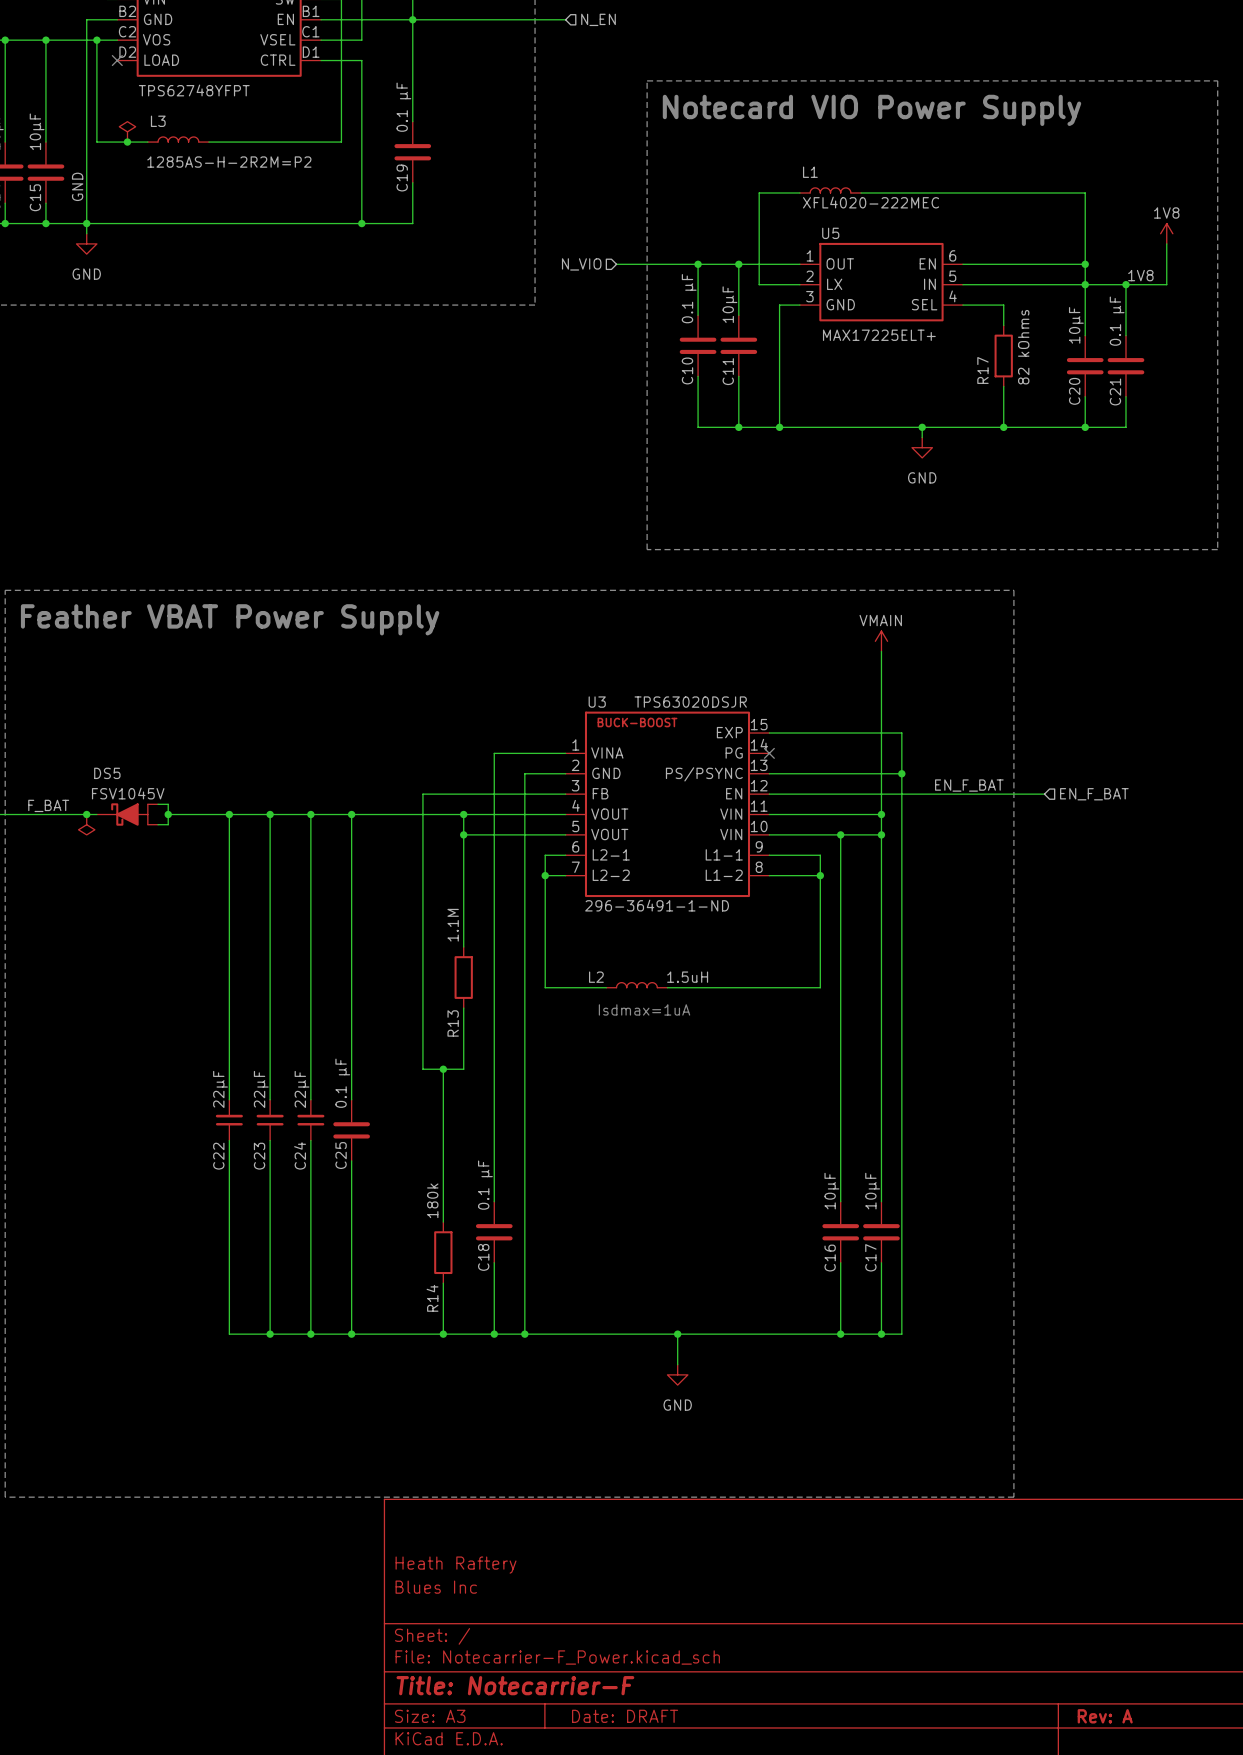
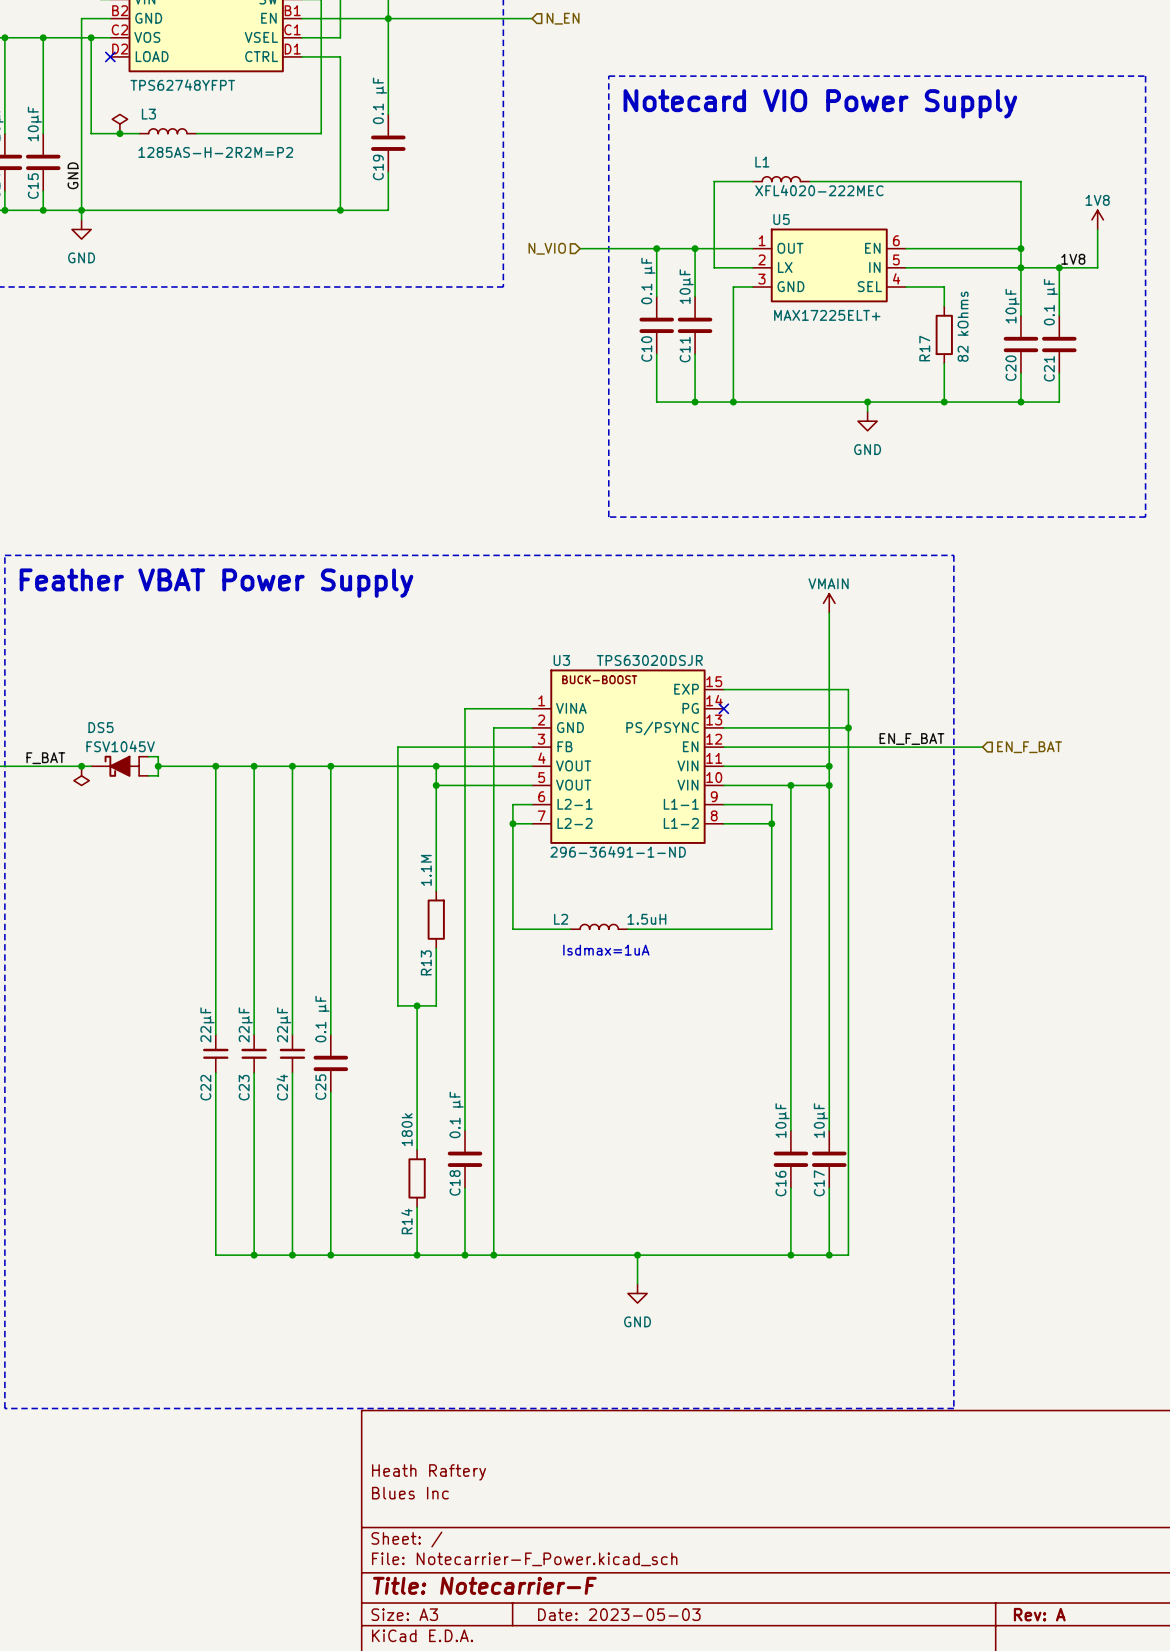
title block: Date: DRAFT (625, 1716) -> Date: 2023-05-03 (619, 1614)

